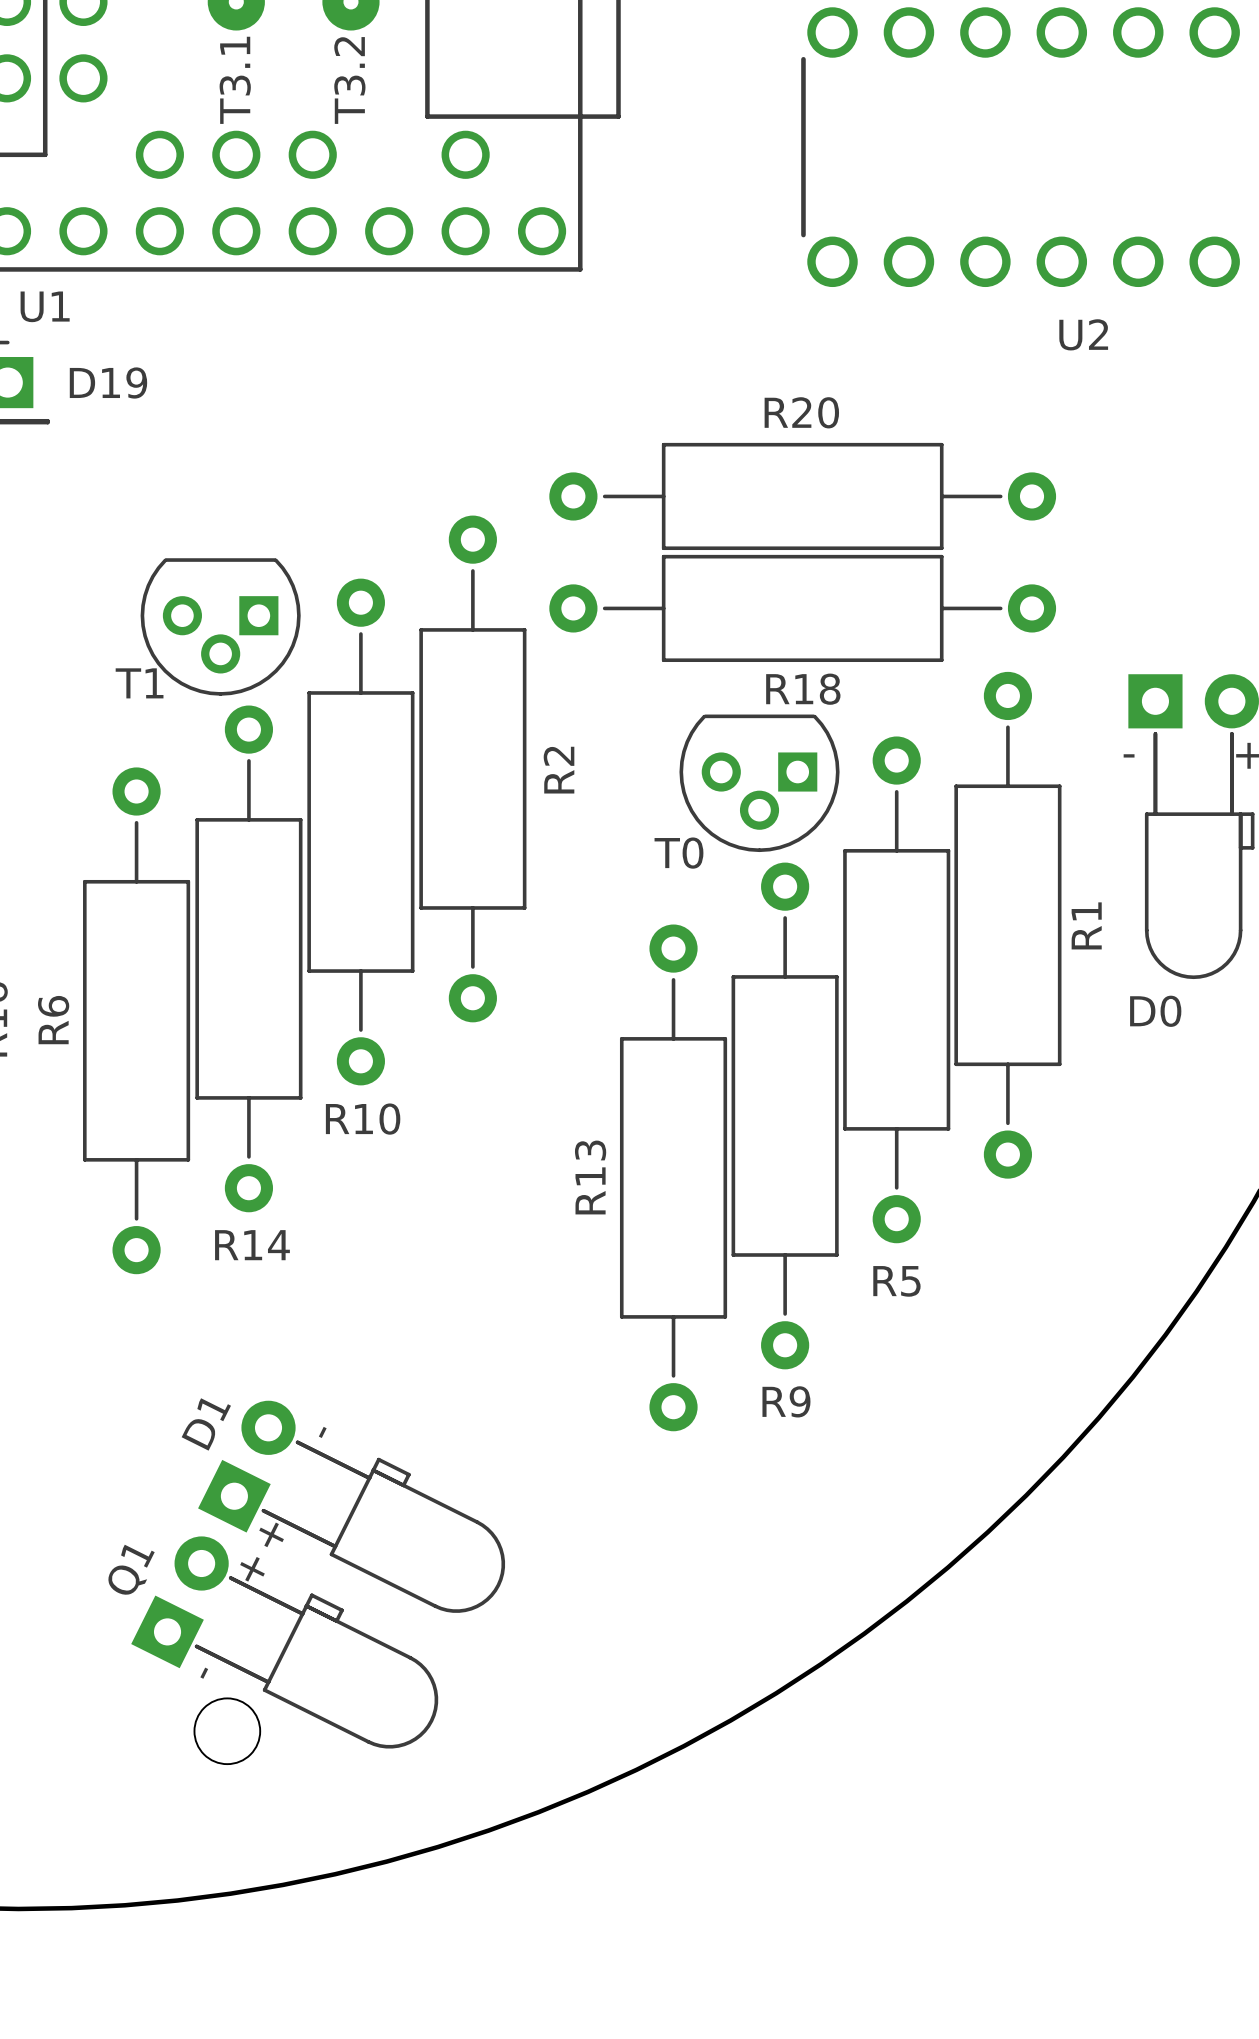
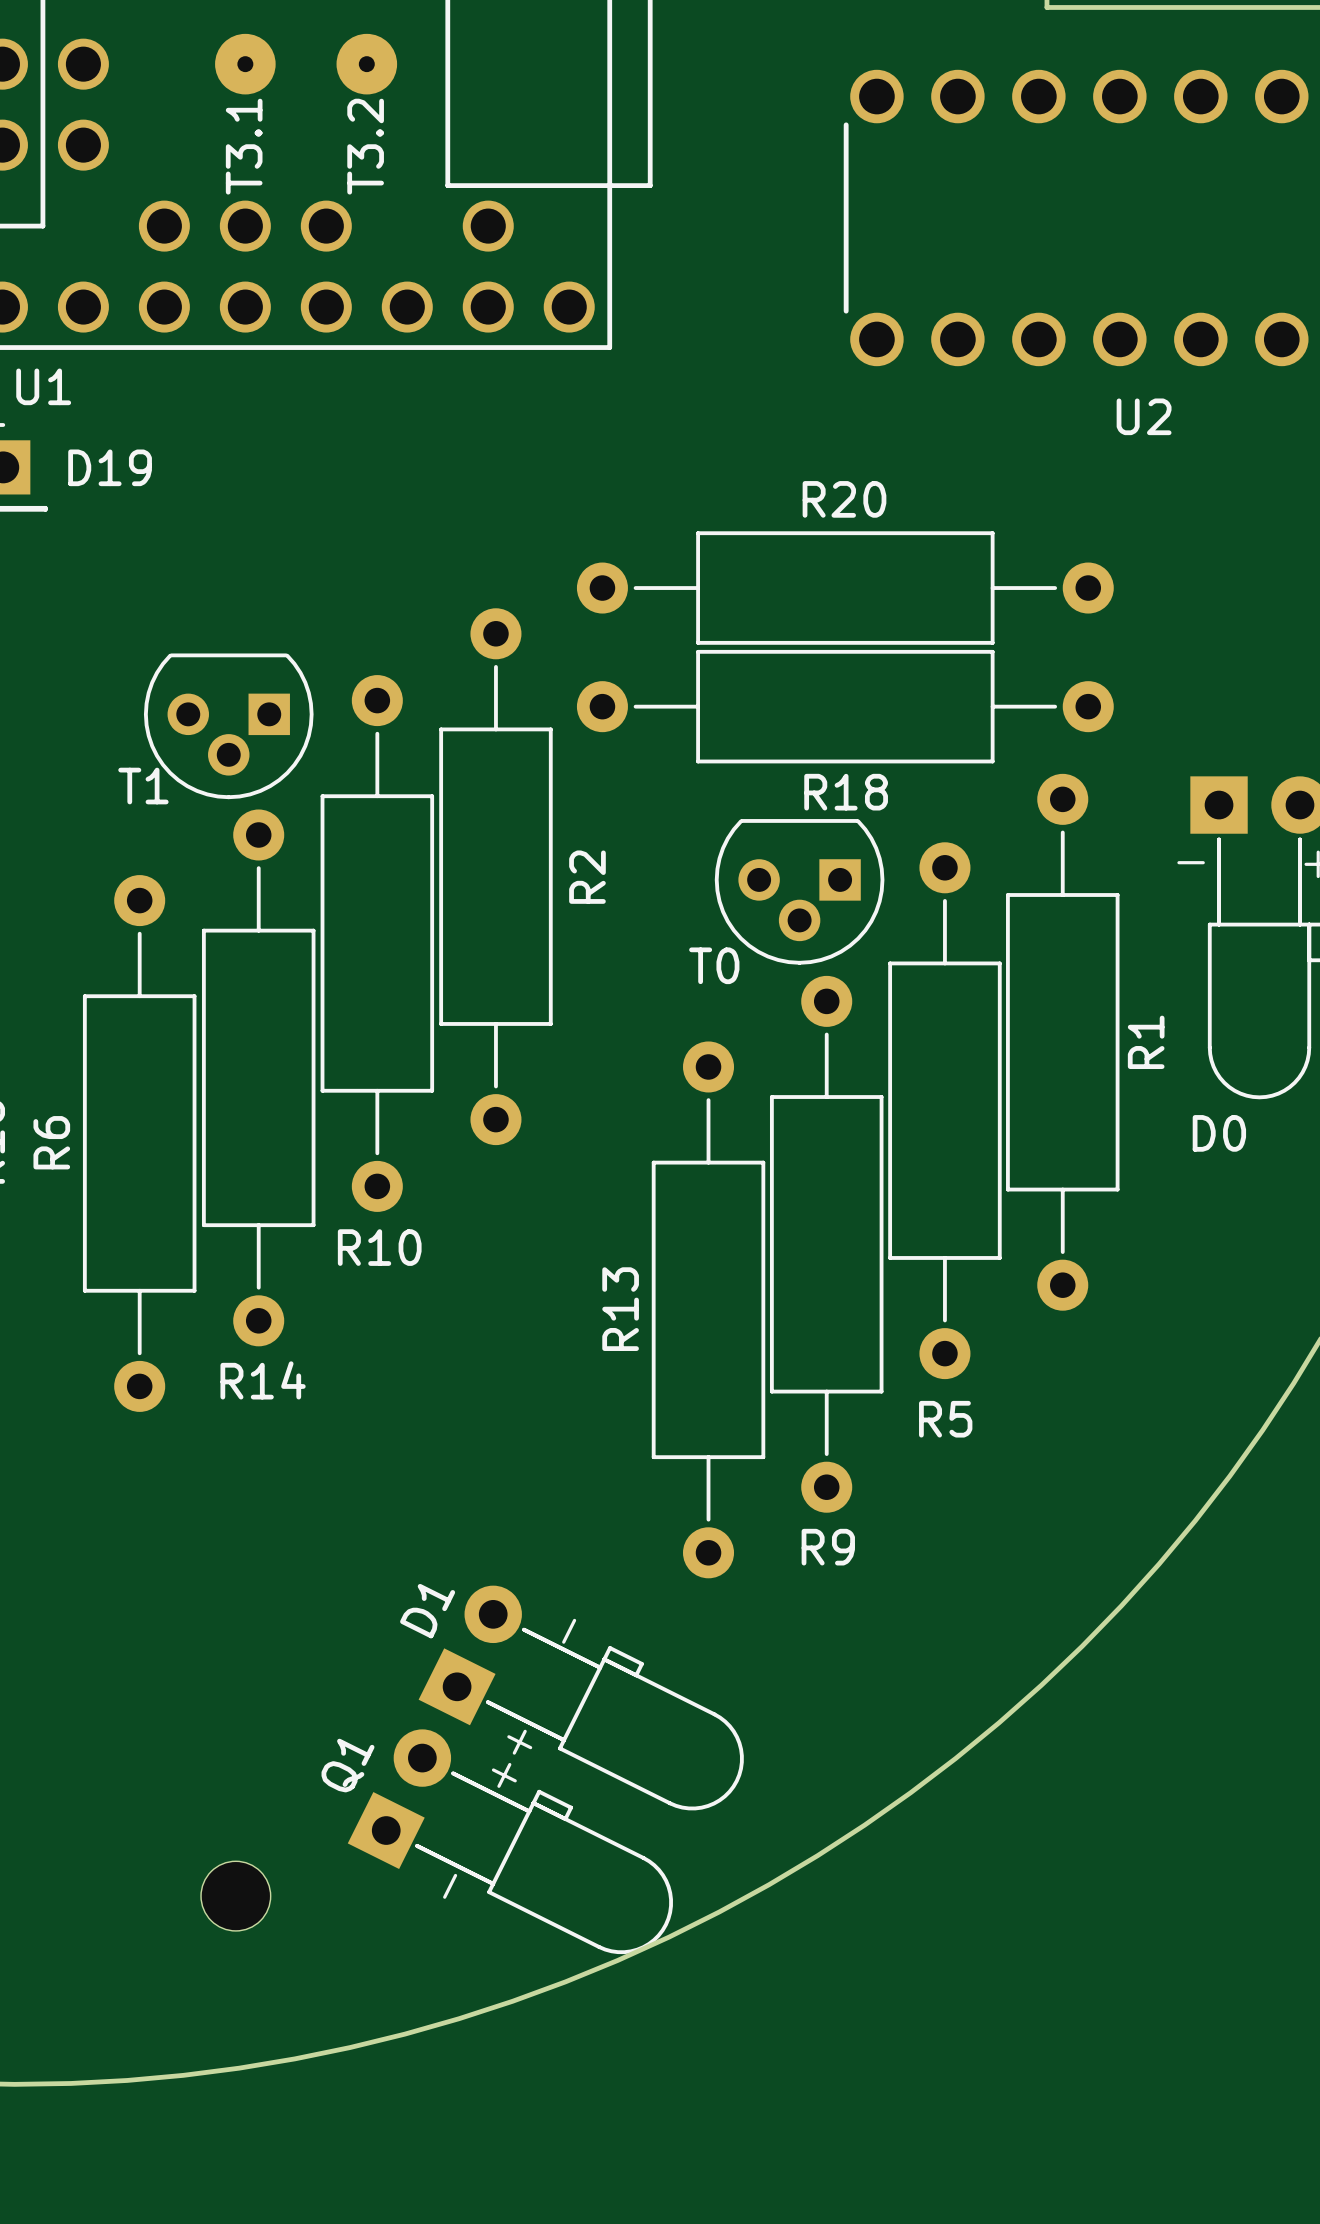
text: - (322, 1432) -> none
text: none -> - (569, 1631)
Q1 position: (351, 1506) -> (581, 1698)
text: + (271, 1534) -> none
text: + (252, 1569) -> none
text: none -> + (519, 1742)
text: none -> + (504, 1775)
D1 position: (284, 1642) -> (510, 1841)
text: - (204, 1673) -> none
text: none -> - (450, 1886)

